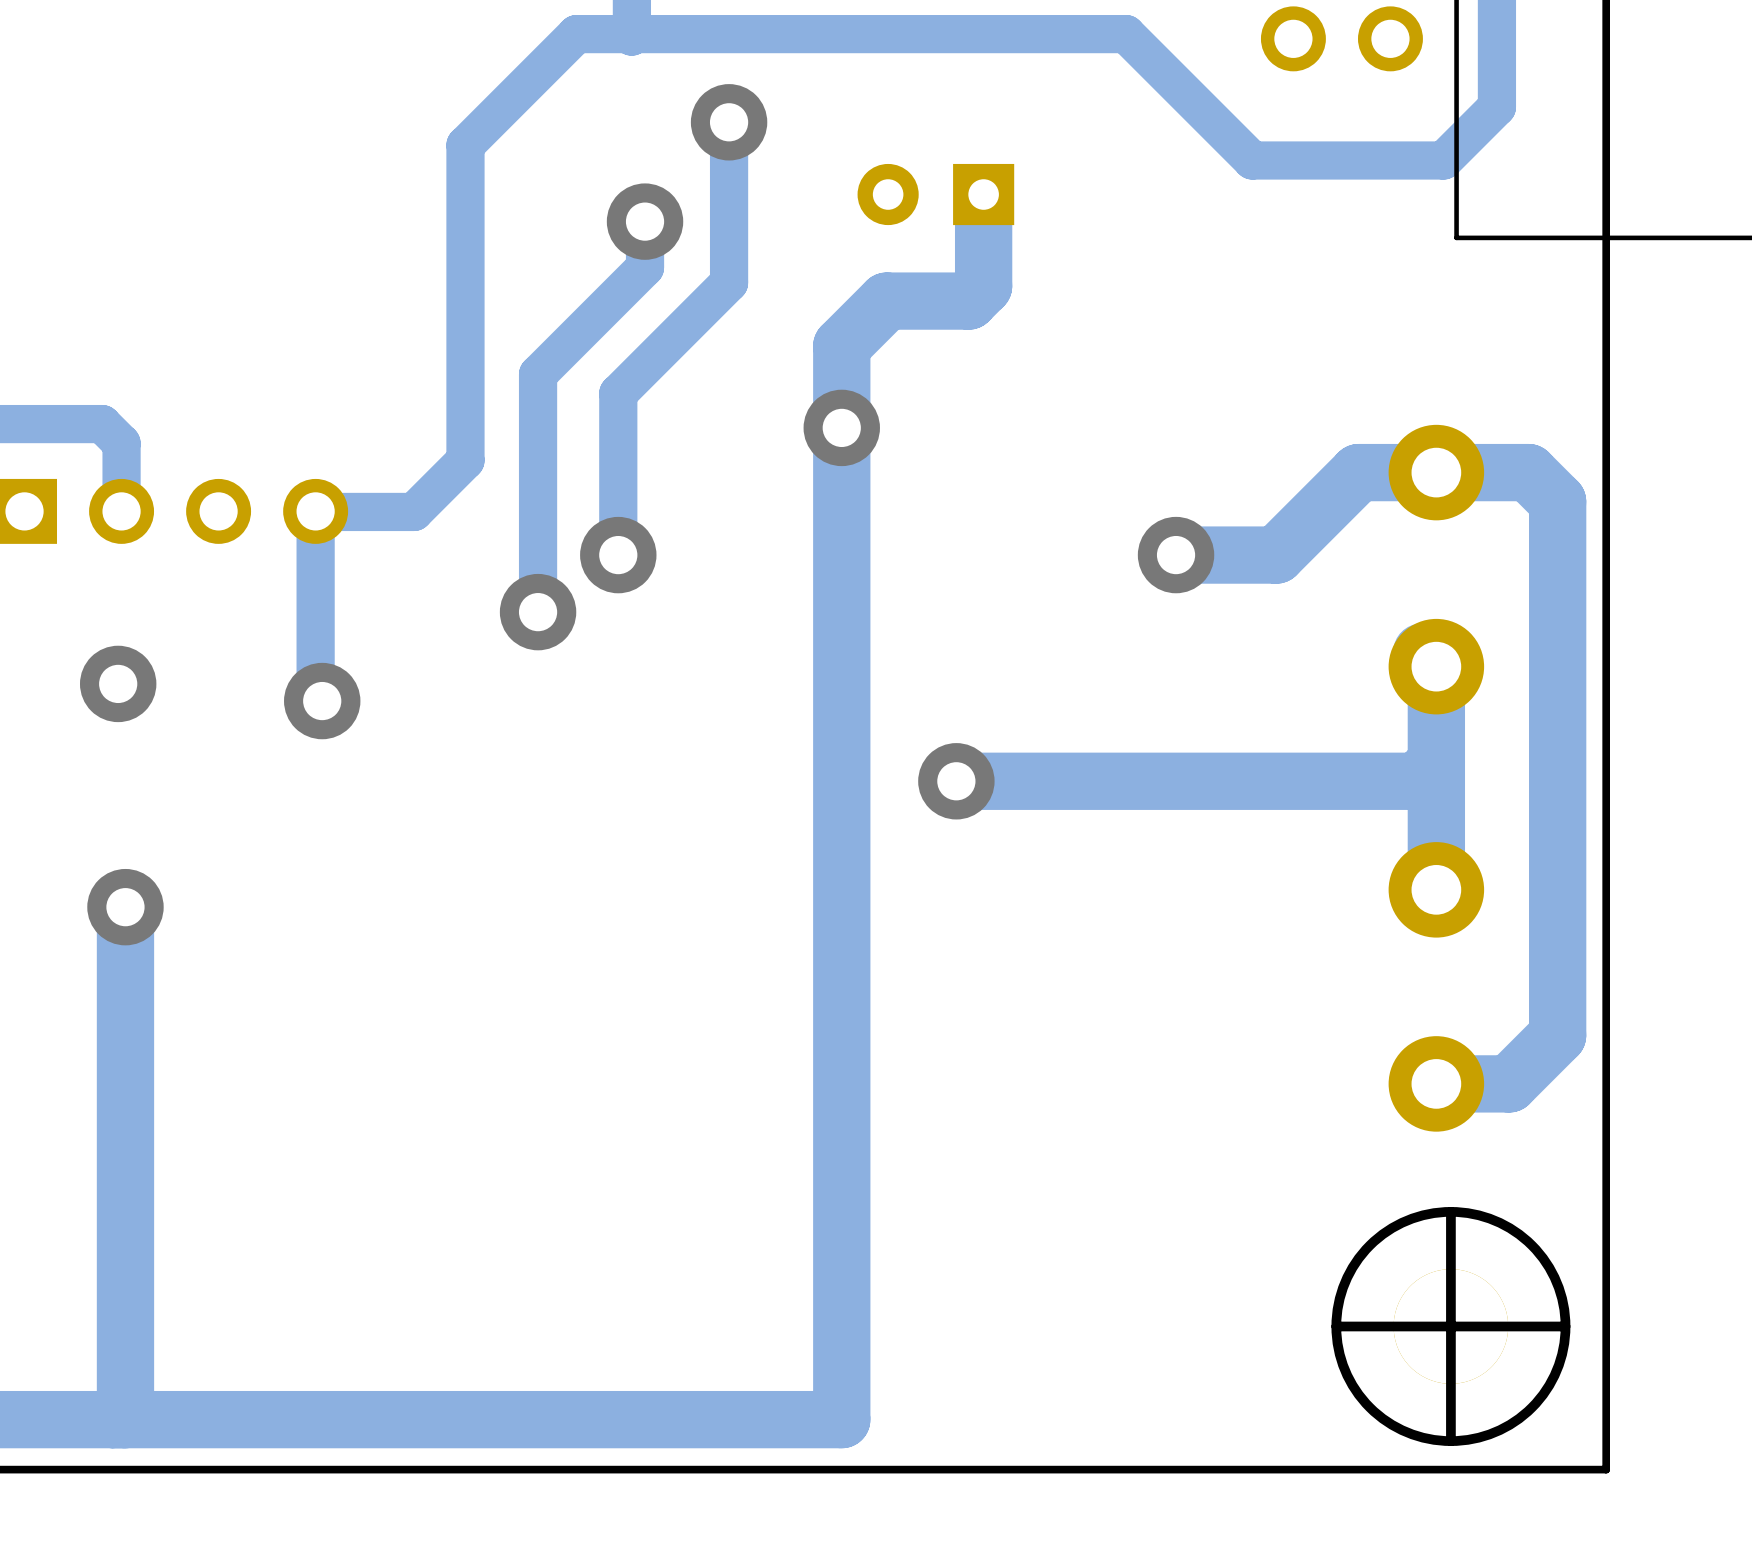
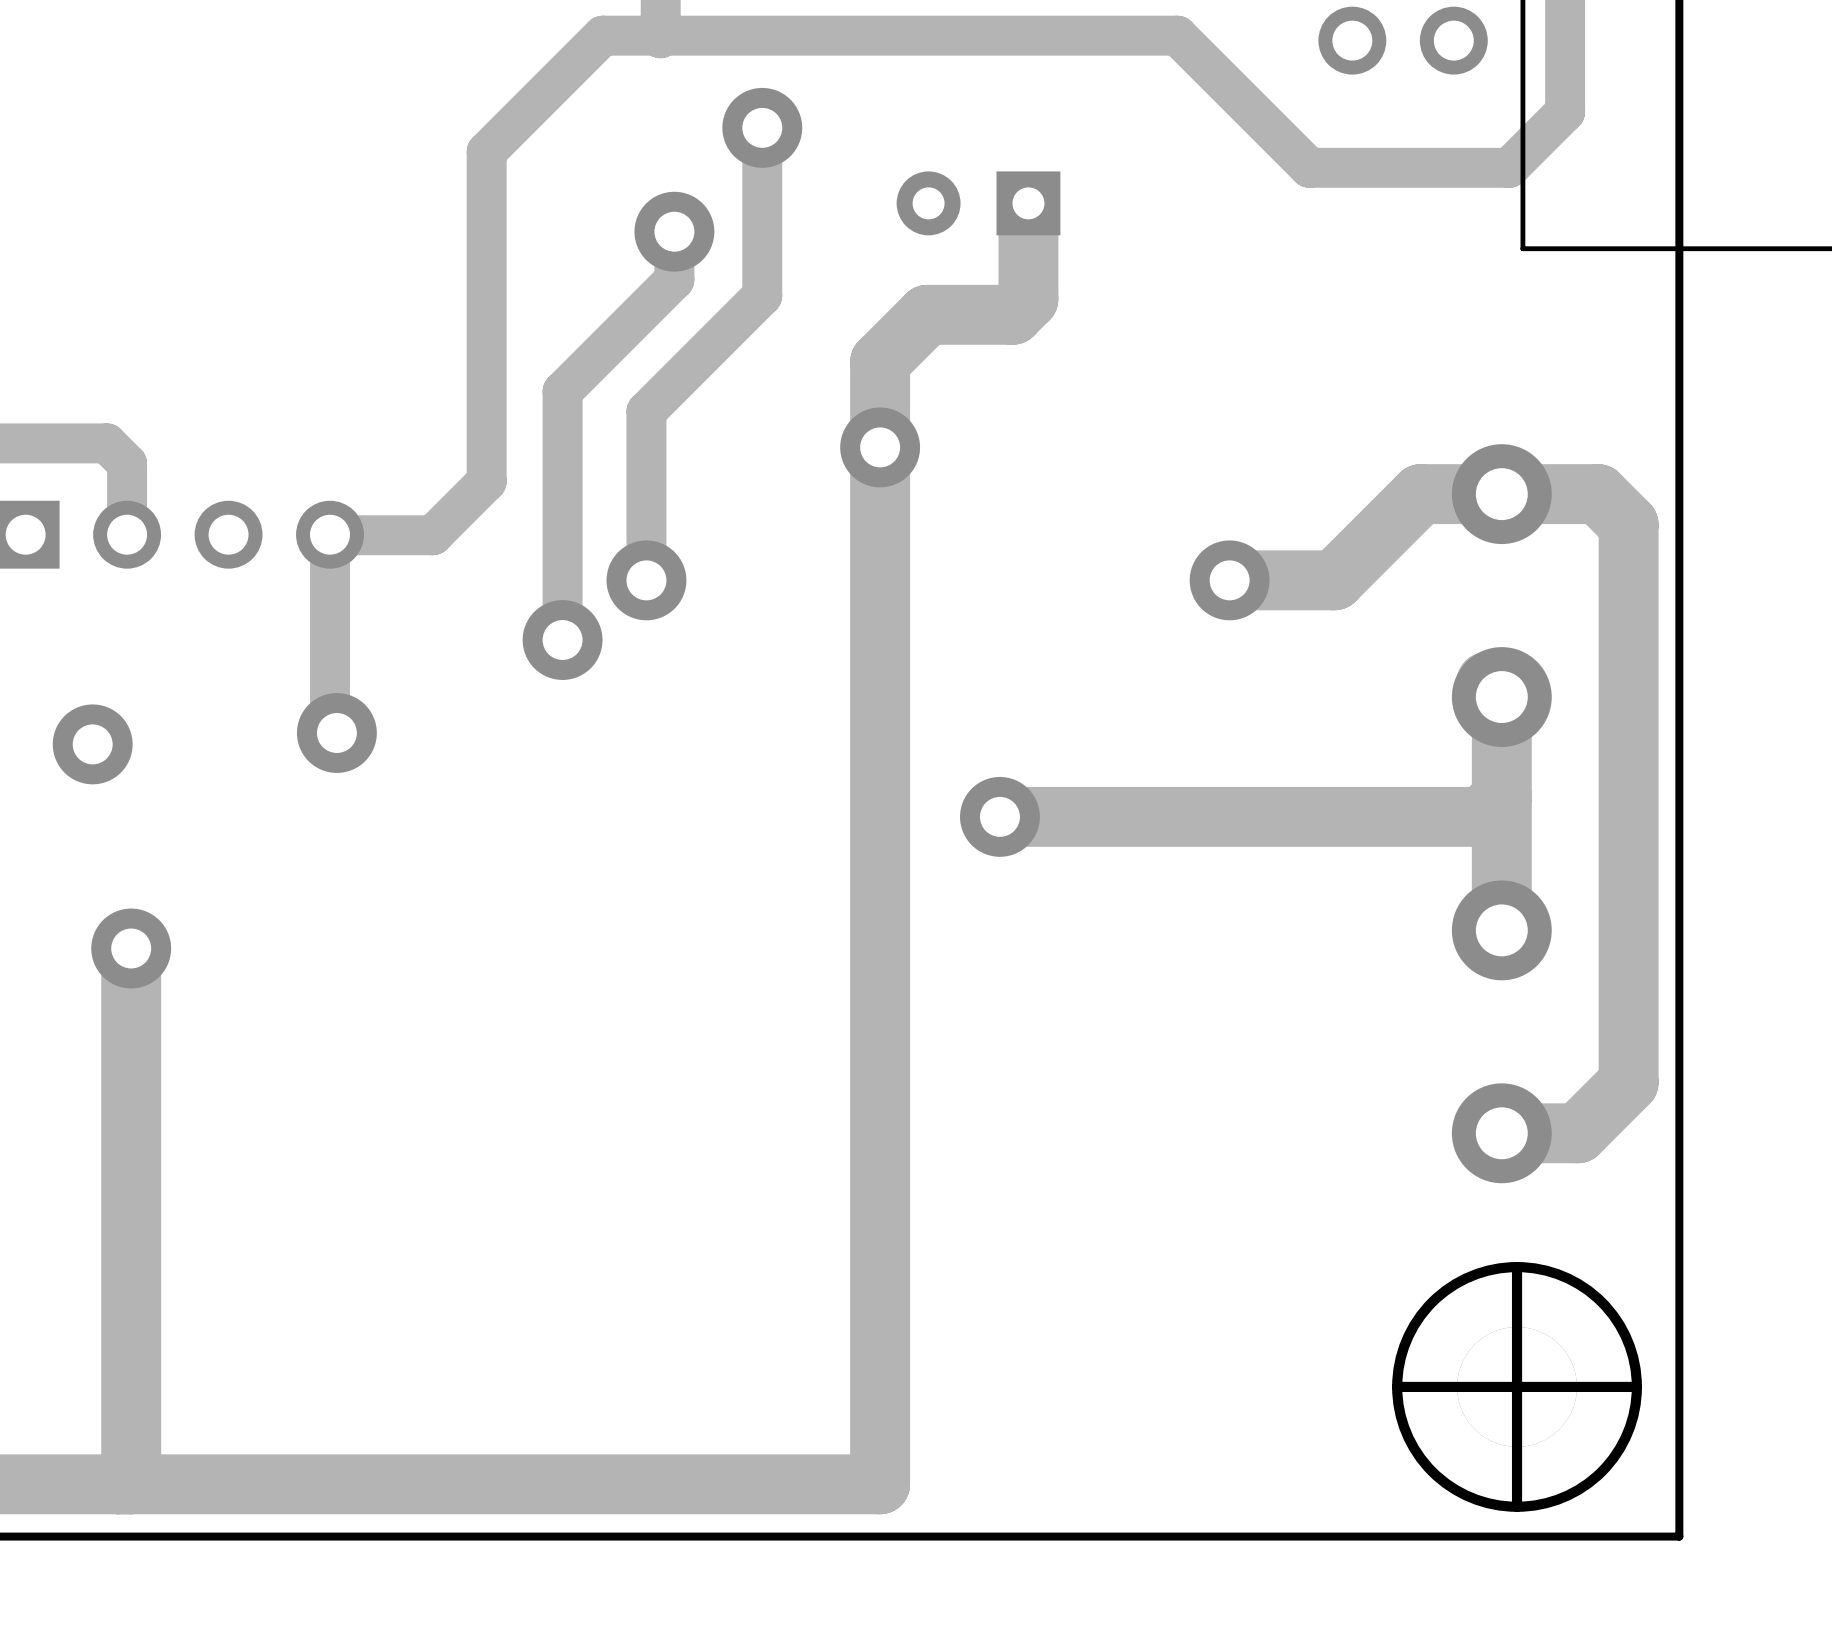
via position: (118, 683) -> (92, 744)

